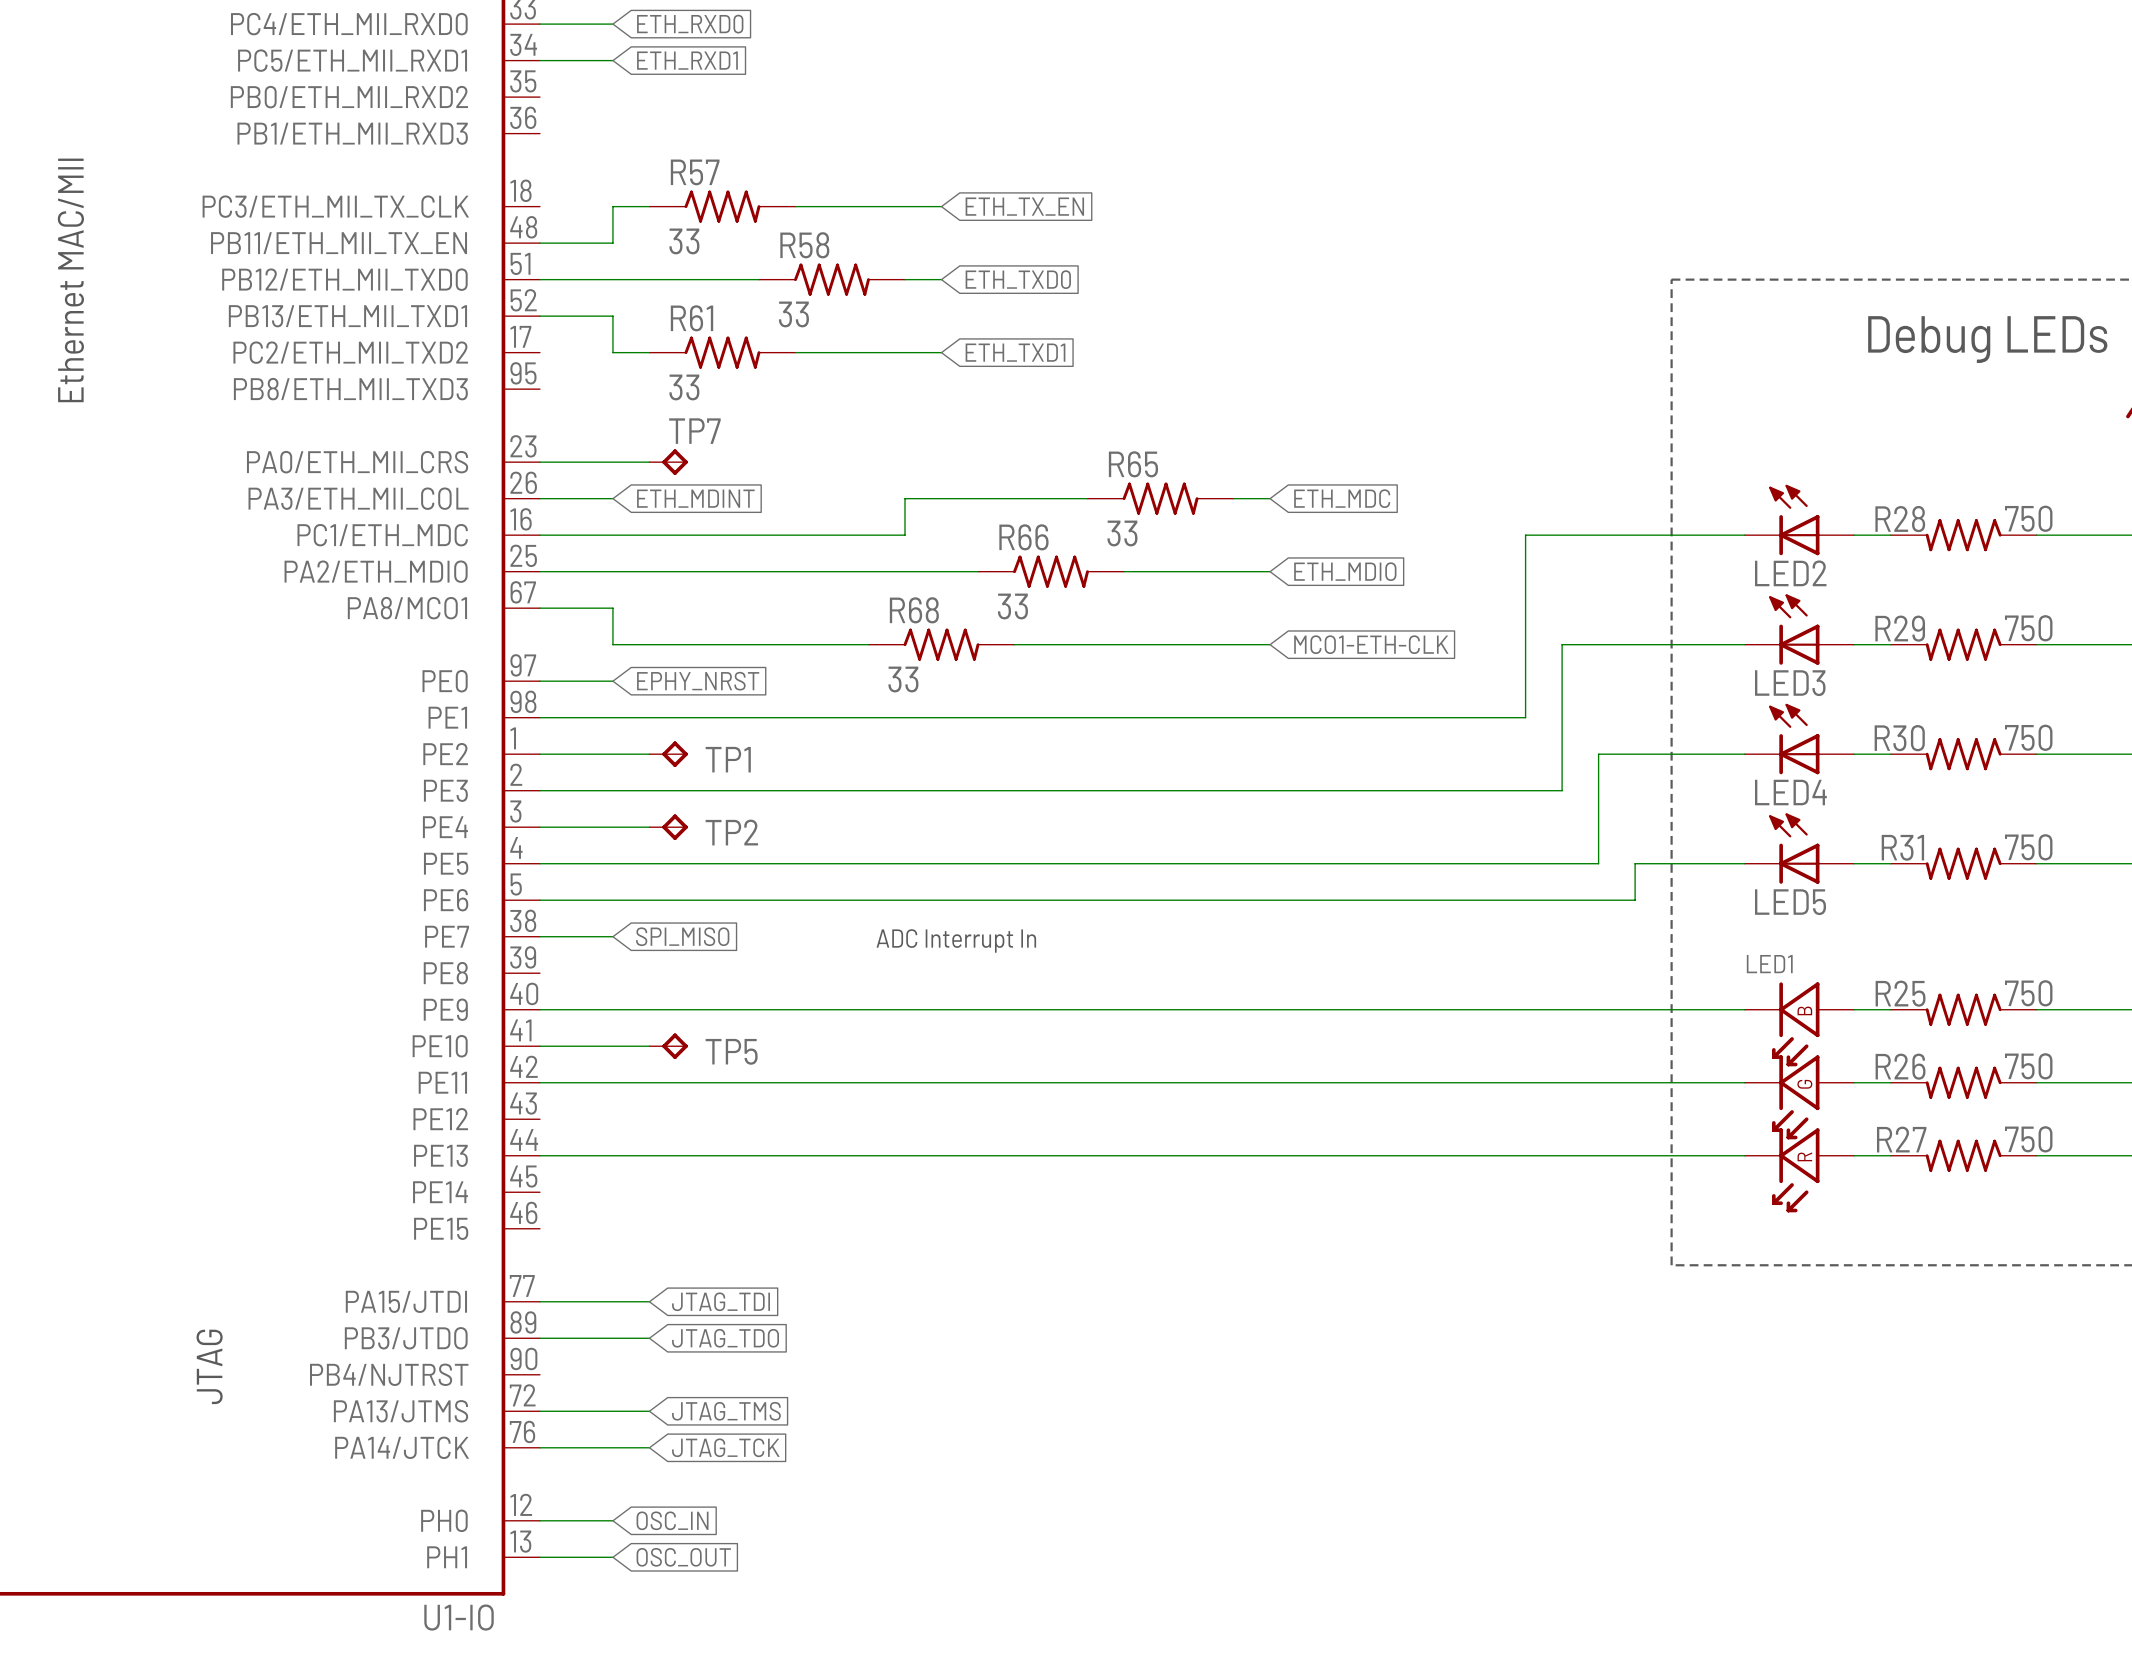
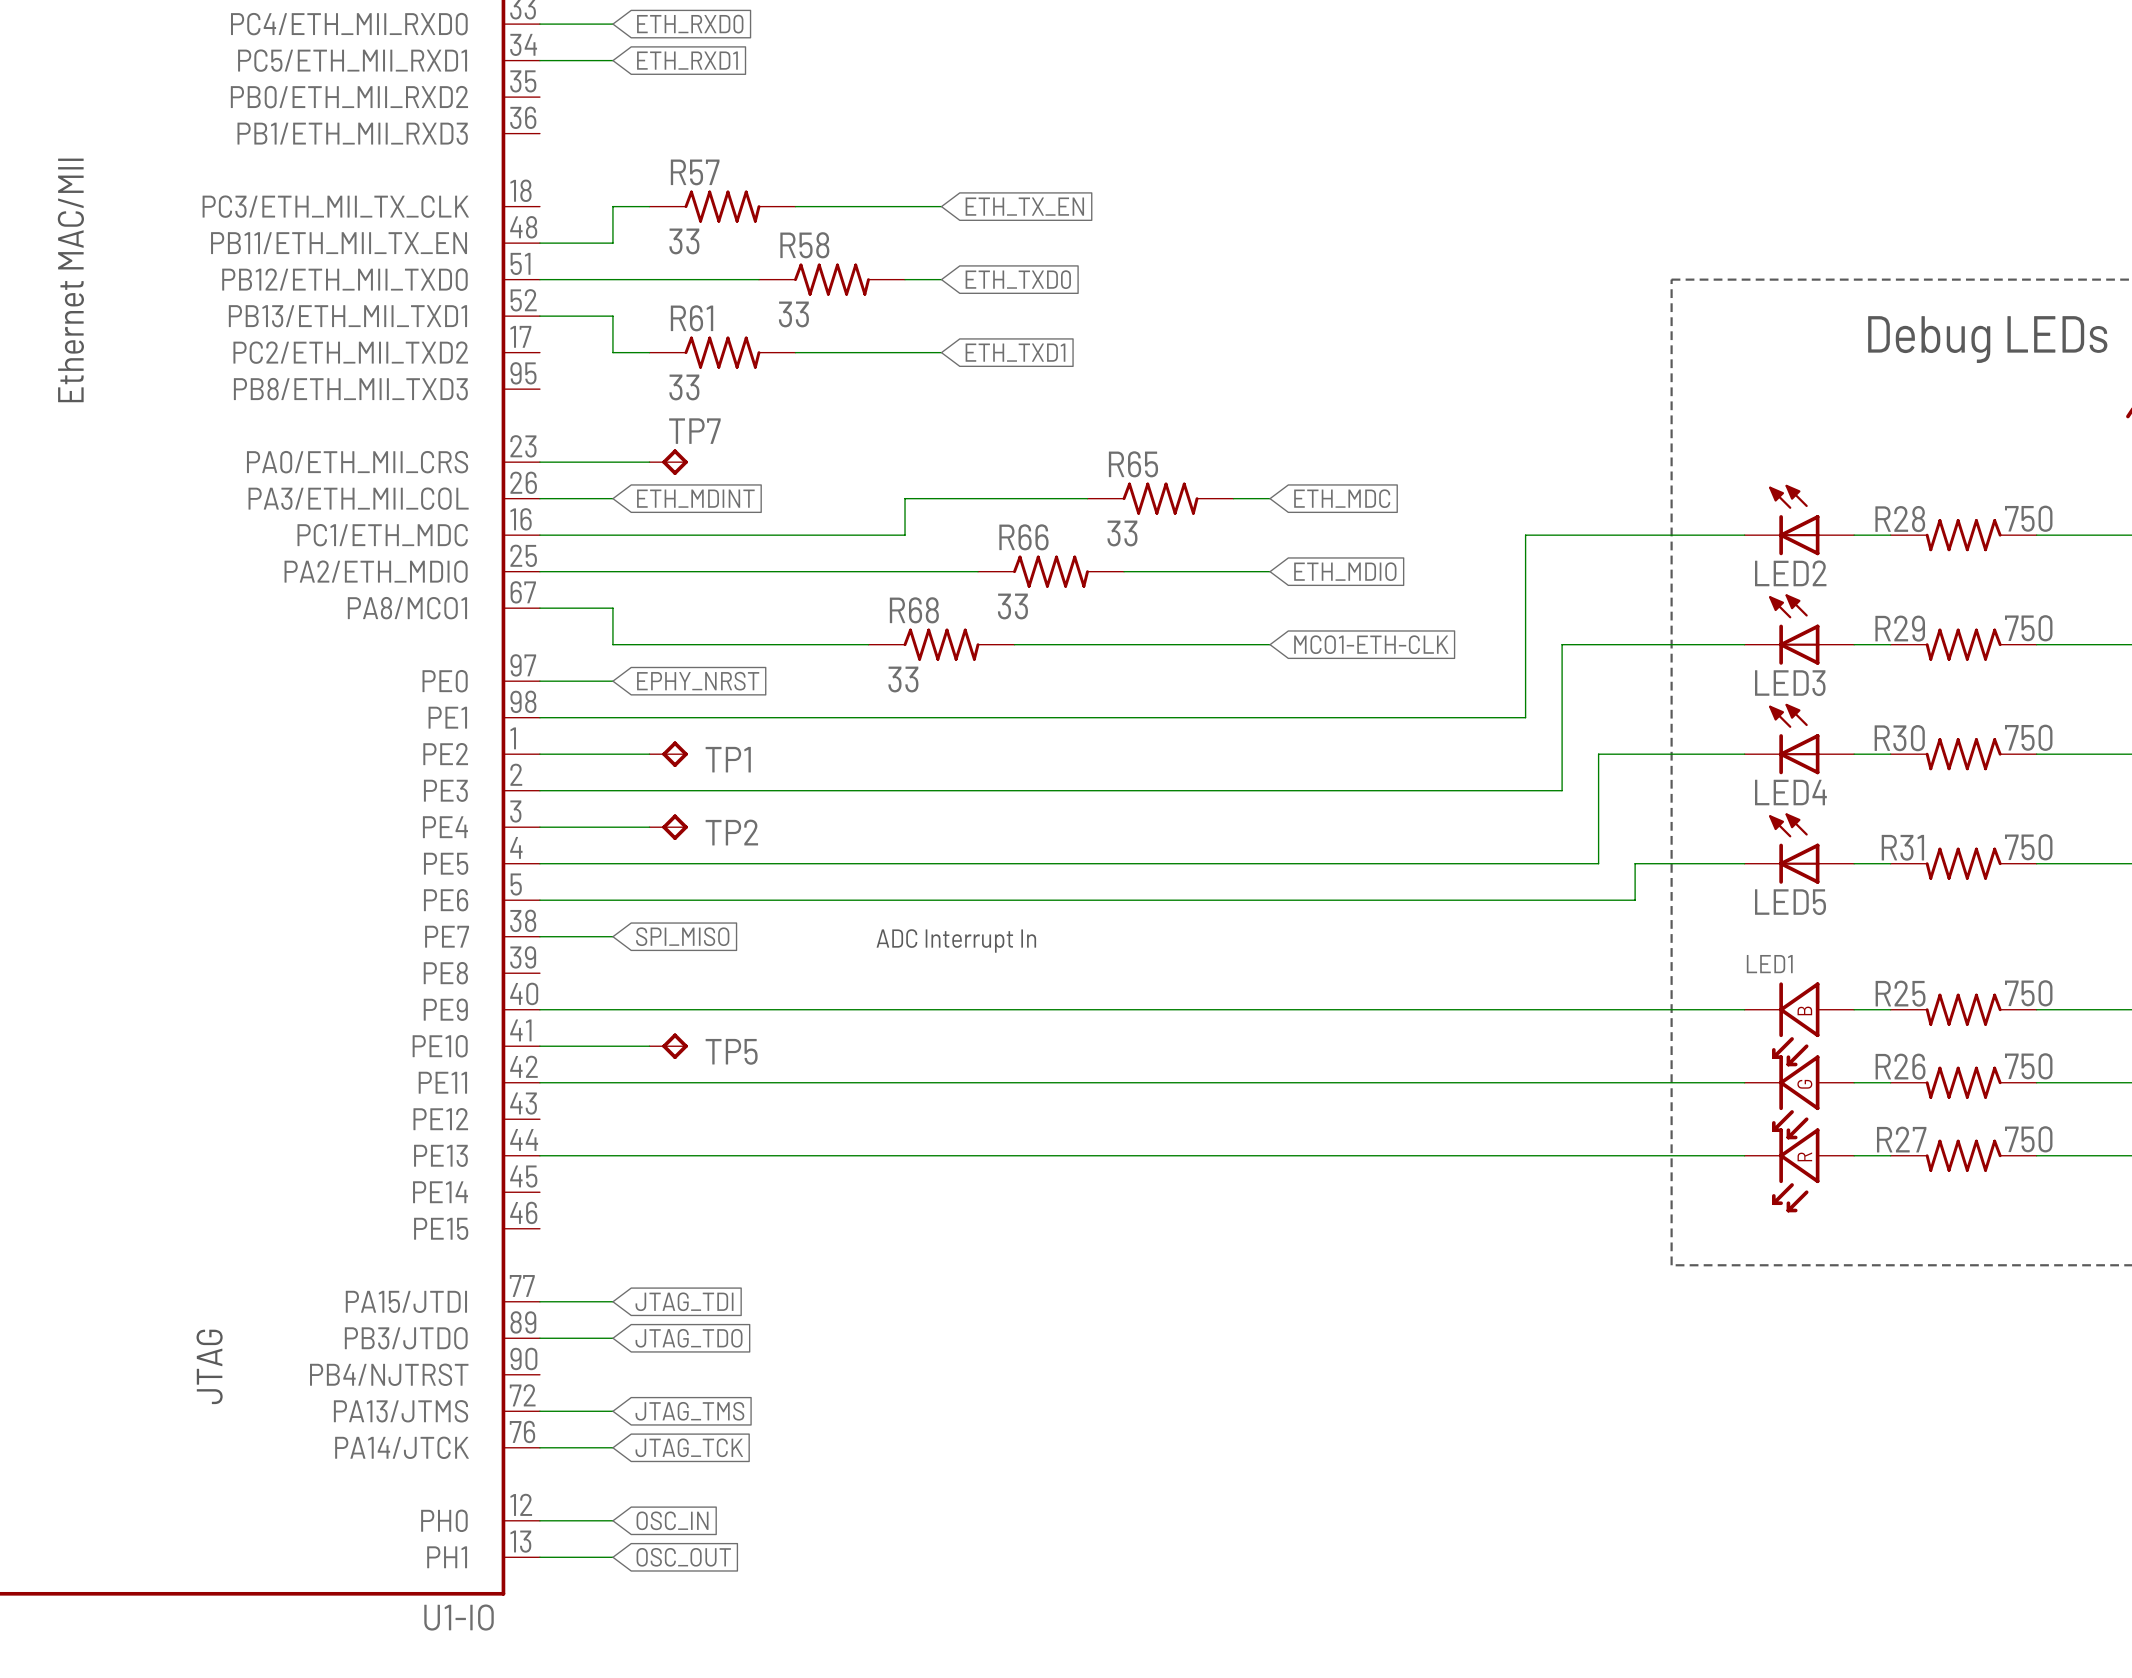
wire: (612, 1301) (649, 1301) -> none
global label position: JTAG_TDI (721, 1301) -> JTAG_TDI (684, 1301)
wire: (612, 1338) (649, 1338) -> none
global label position: JTAG_TDO (725, 1338) -> JTAG_TDO (689, 1338)
wire: (612, 1411) (649, 1411) -> none
global label position: JTAG_TMS (726, 1411) -> JTAG_TMS (689, 1411)
wire: (612, 1447) (649, 1447) -> none
global label position: JTAG_TCK (725, 1447) -> JTAG_TCK (689, 1447)

